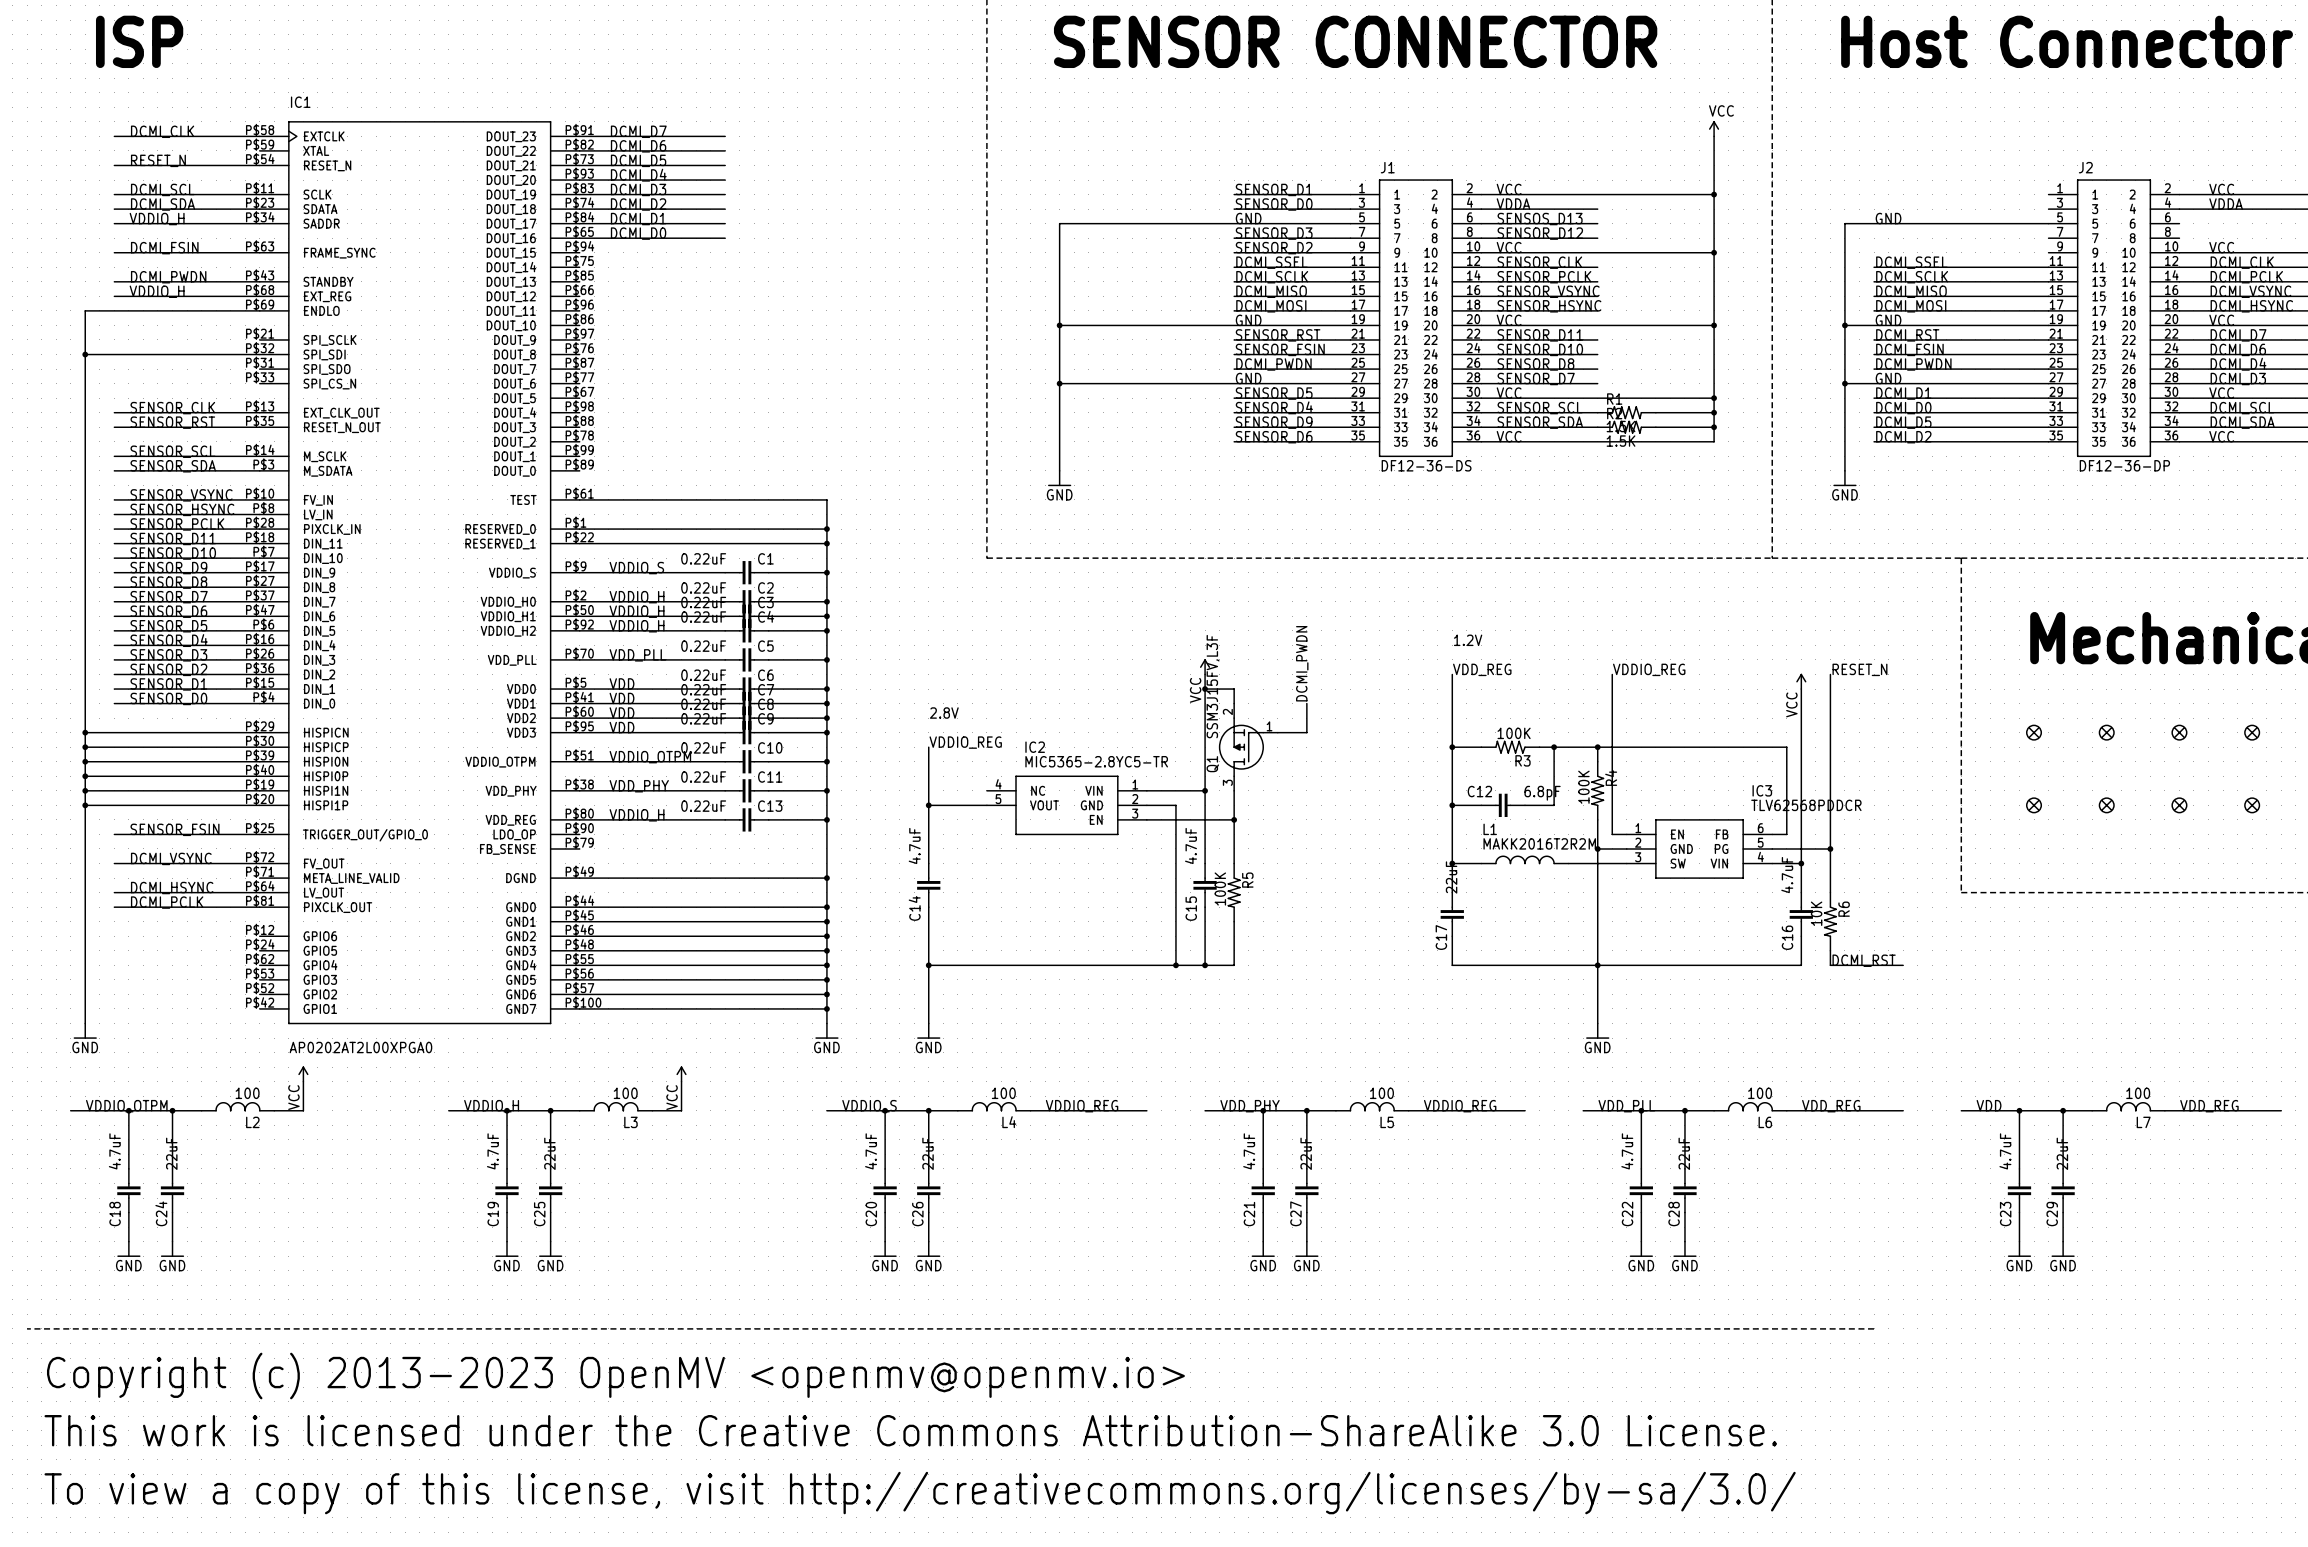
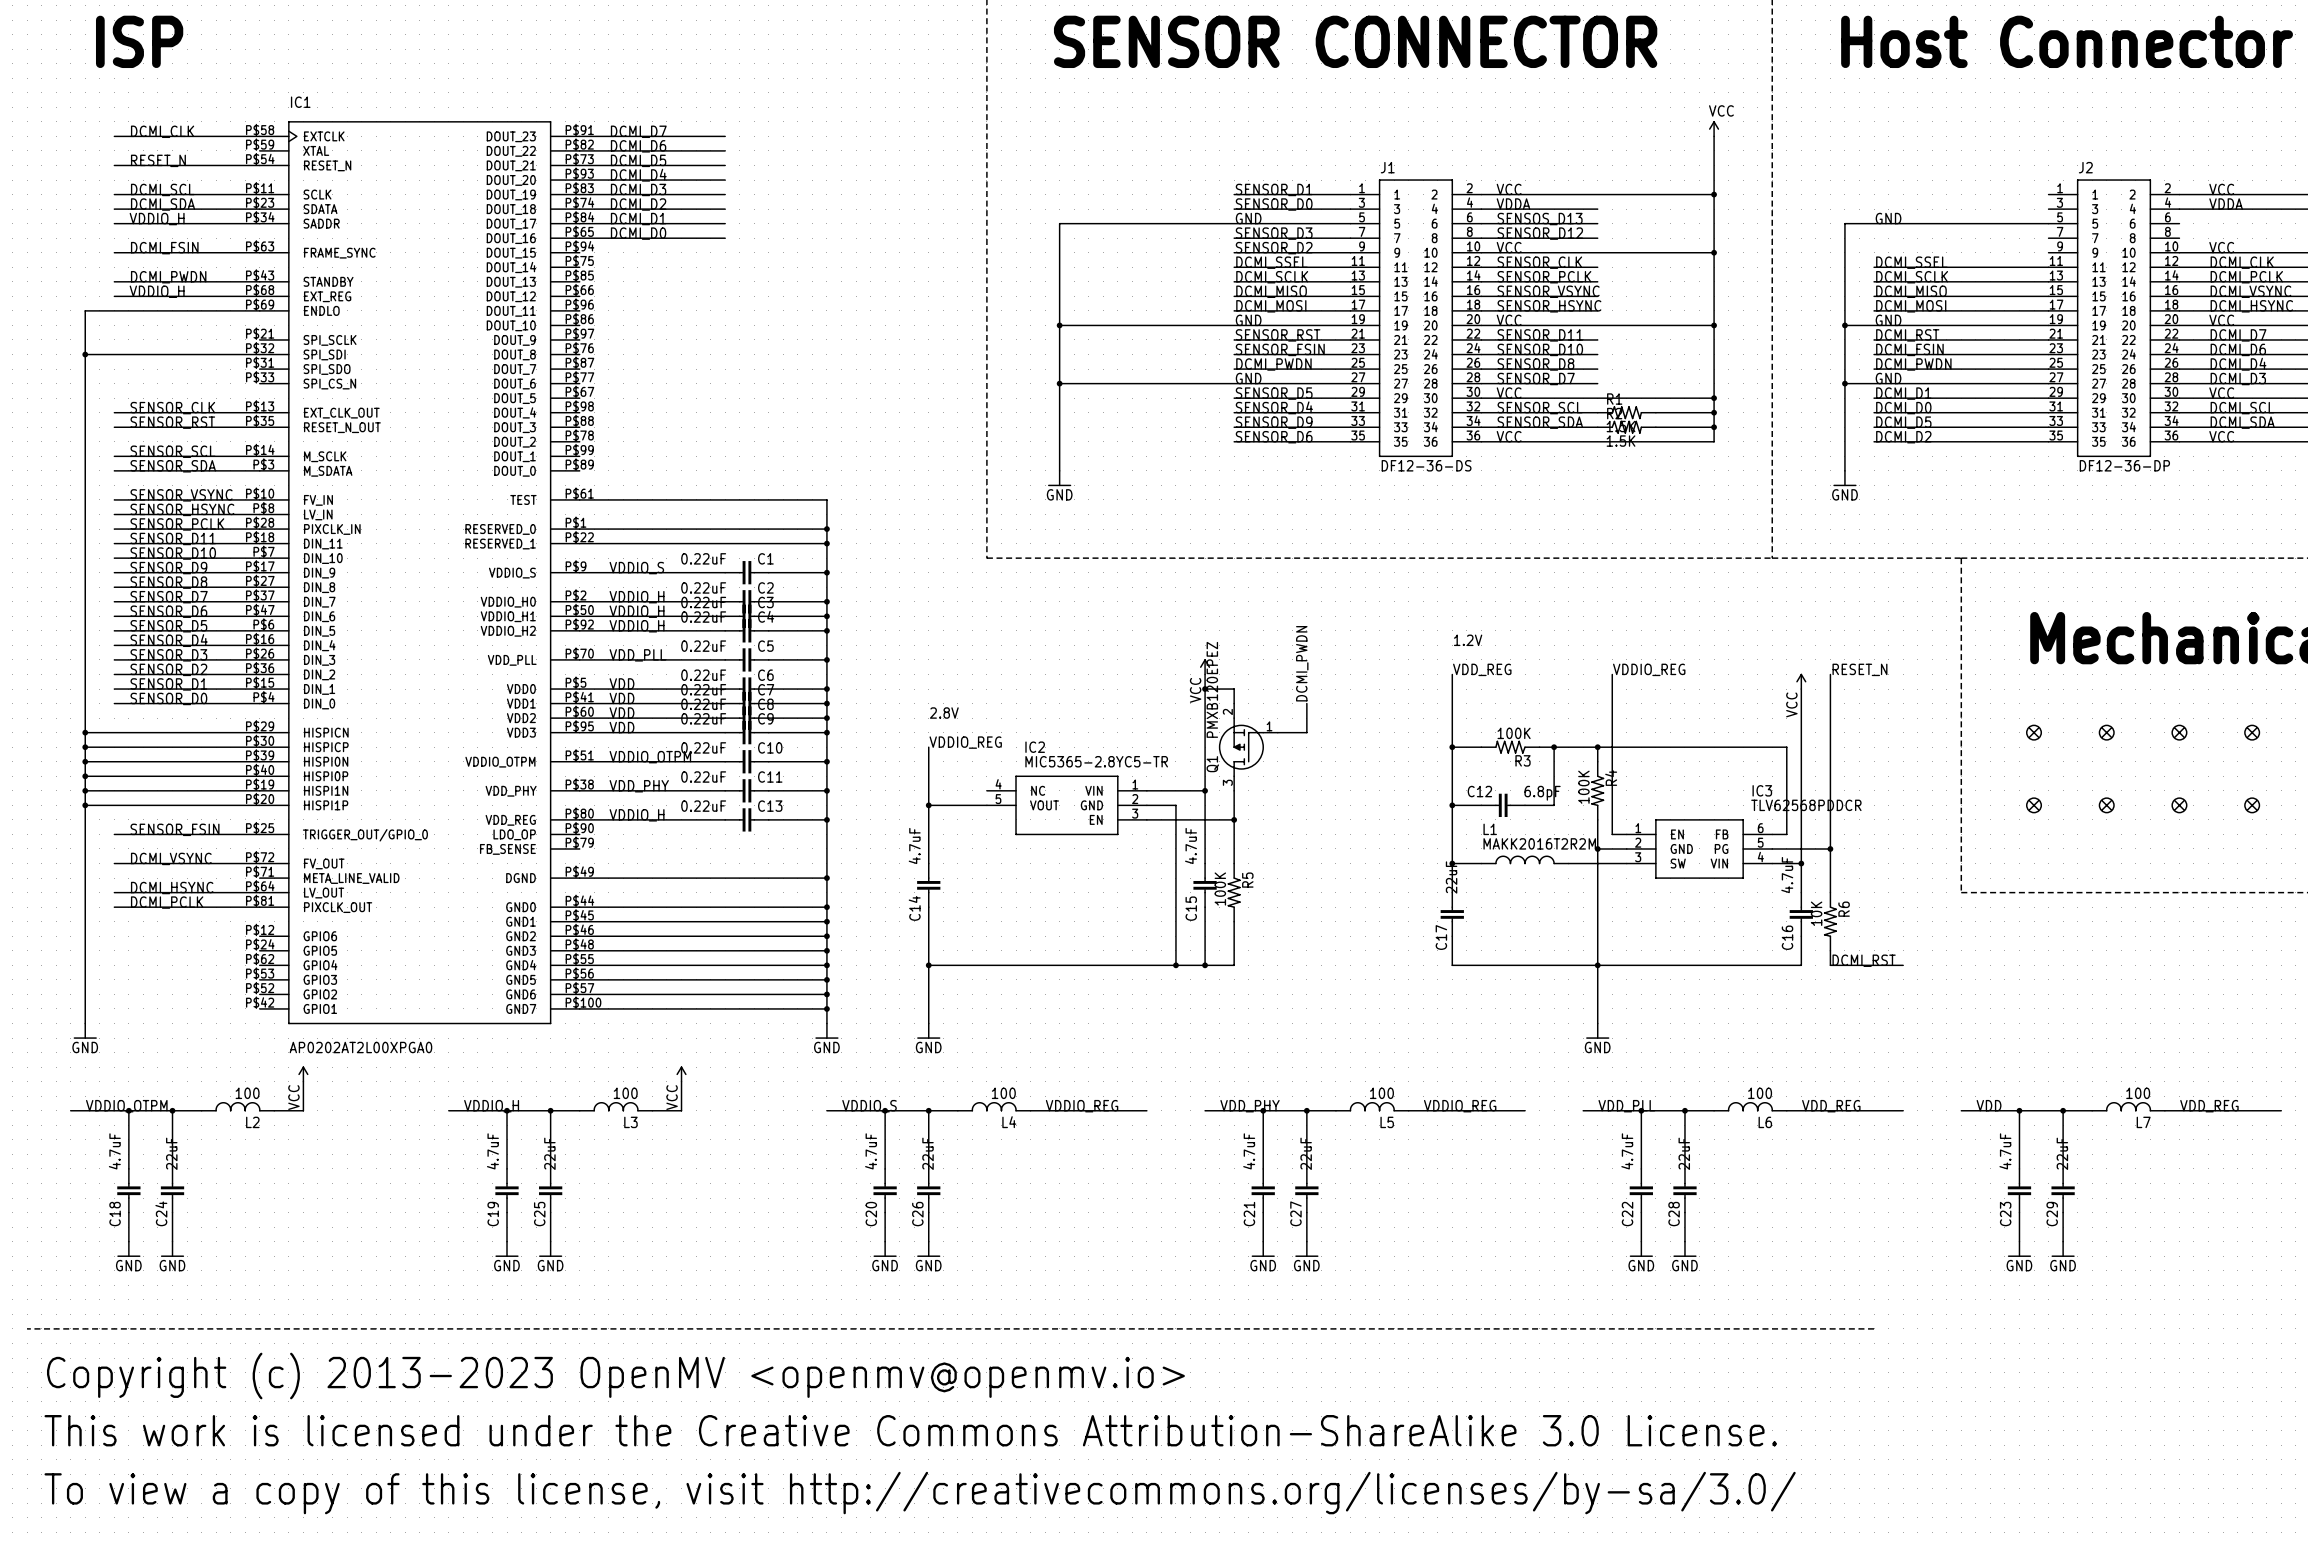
Q1 value: SSM3J15FV,L3F (1213, 686) -> PMXB120EPEZ (1212, 689)

